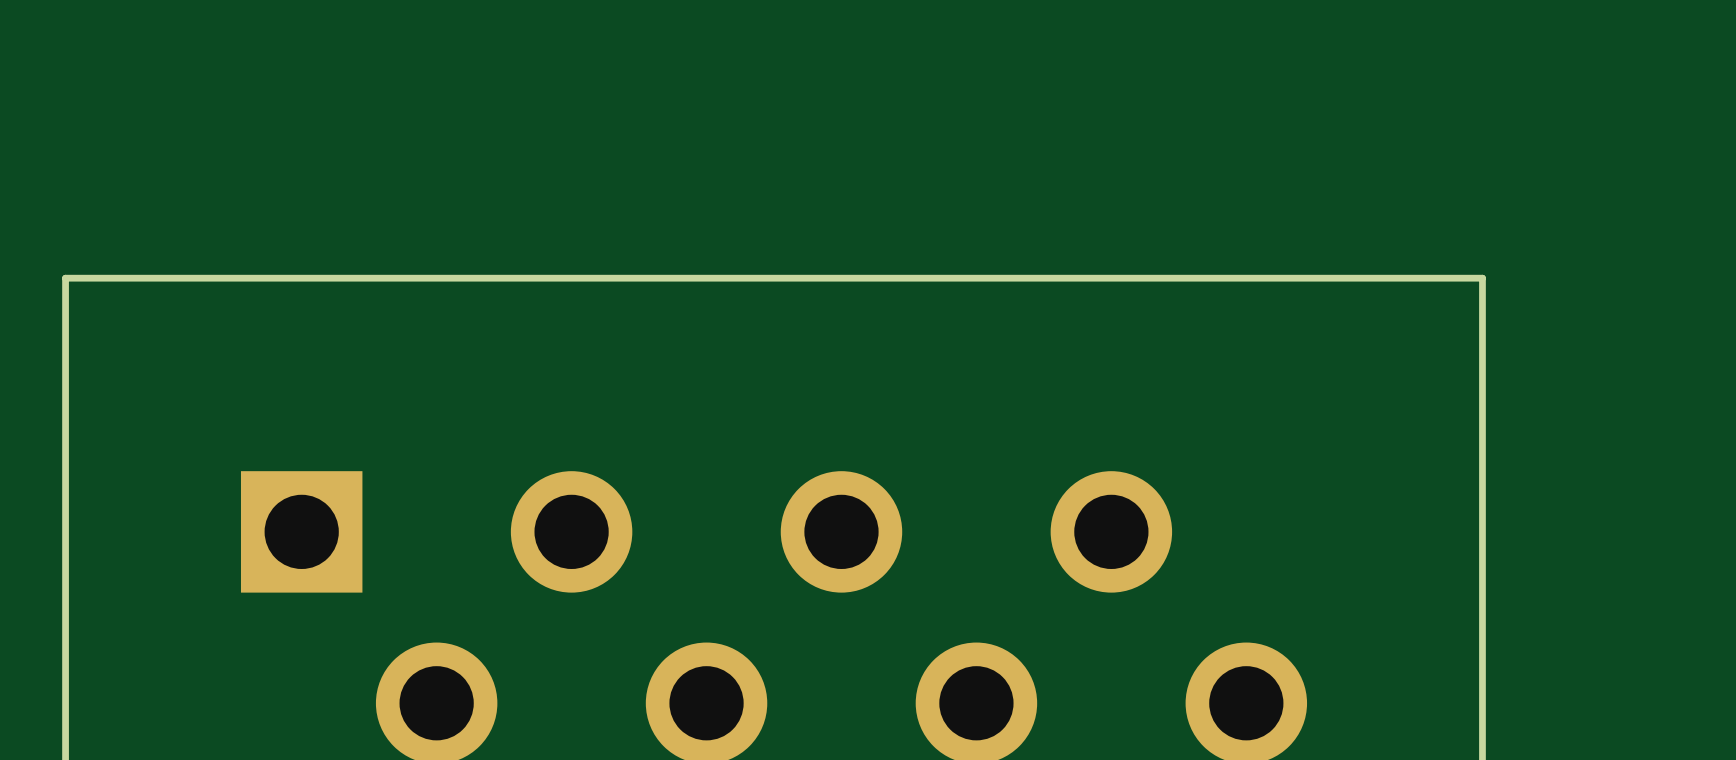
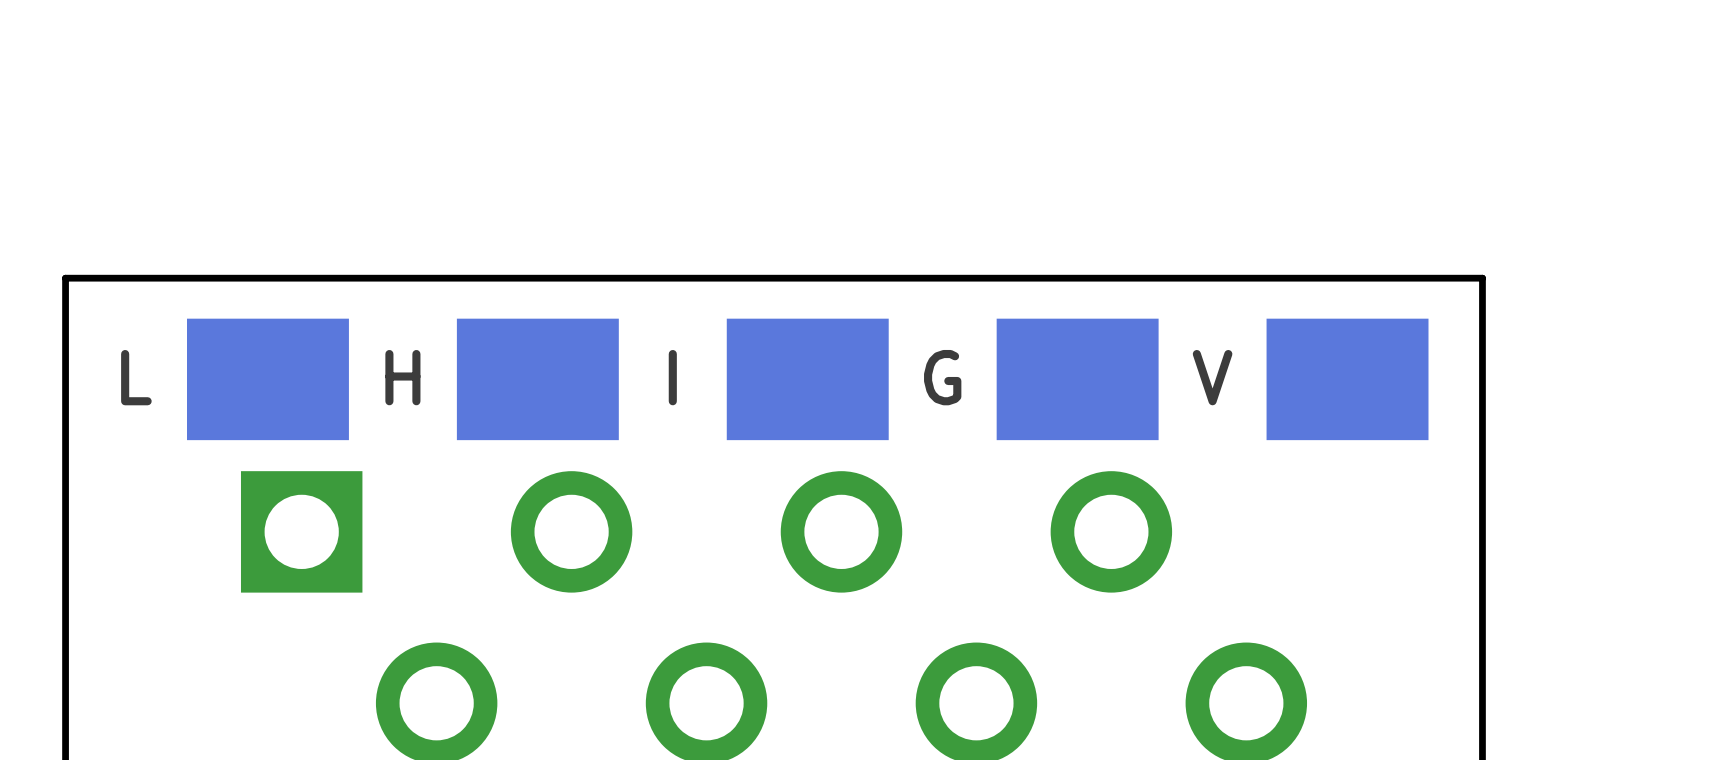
part: none -> (807, 379)

